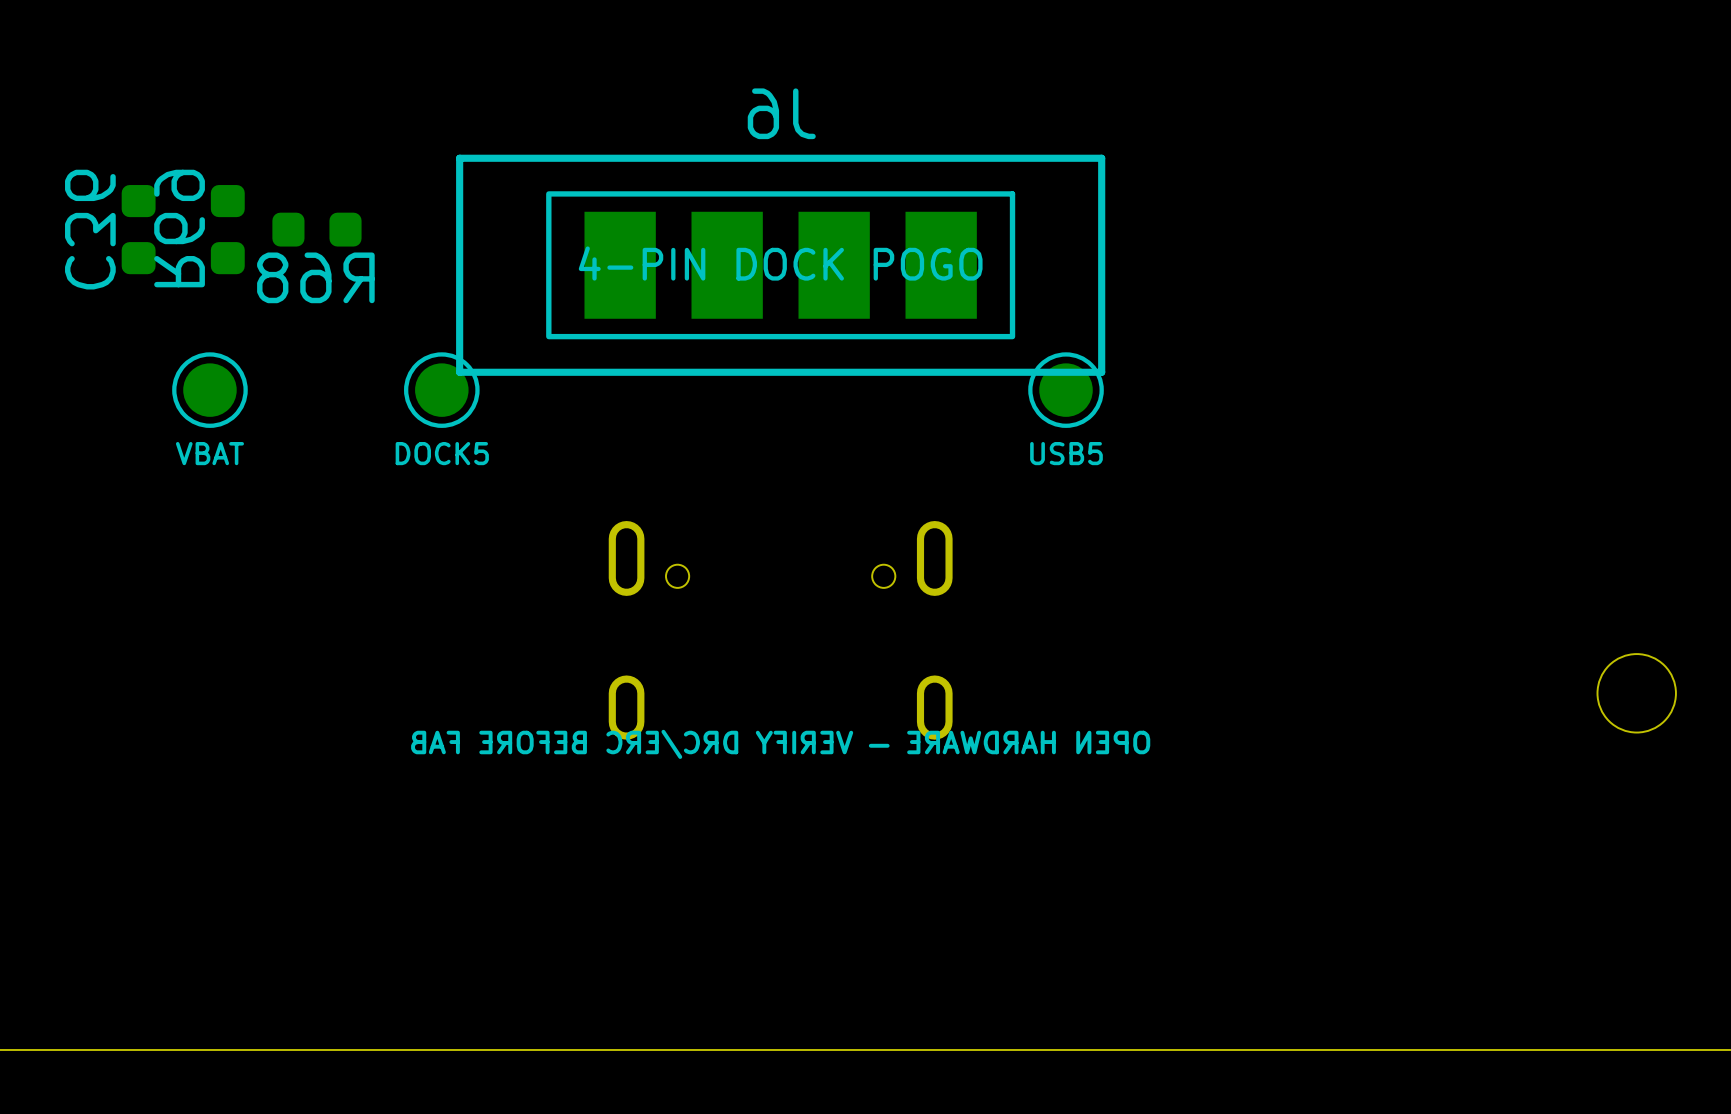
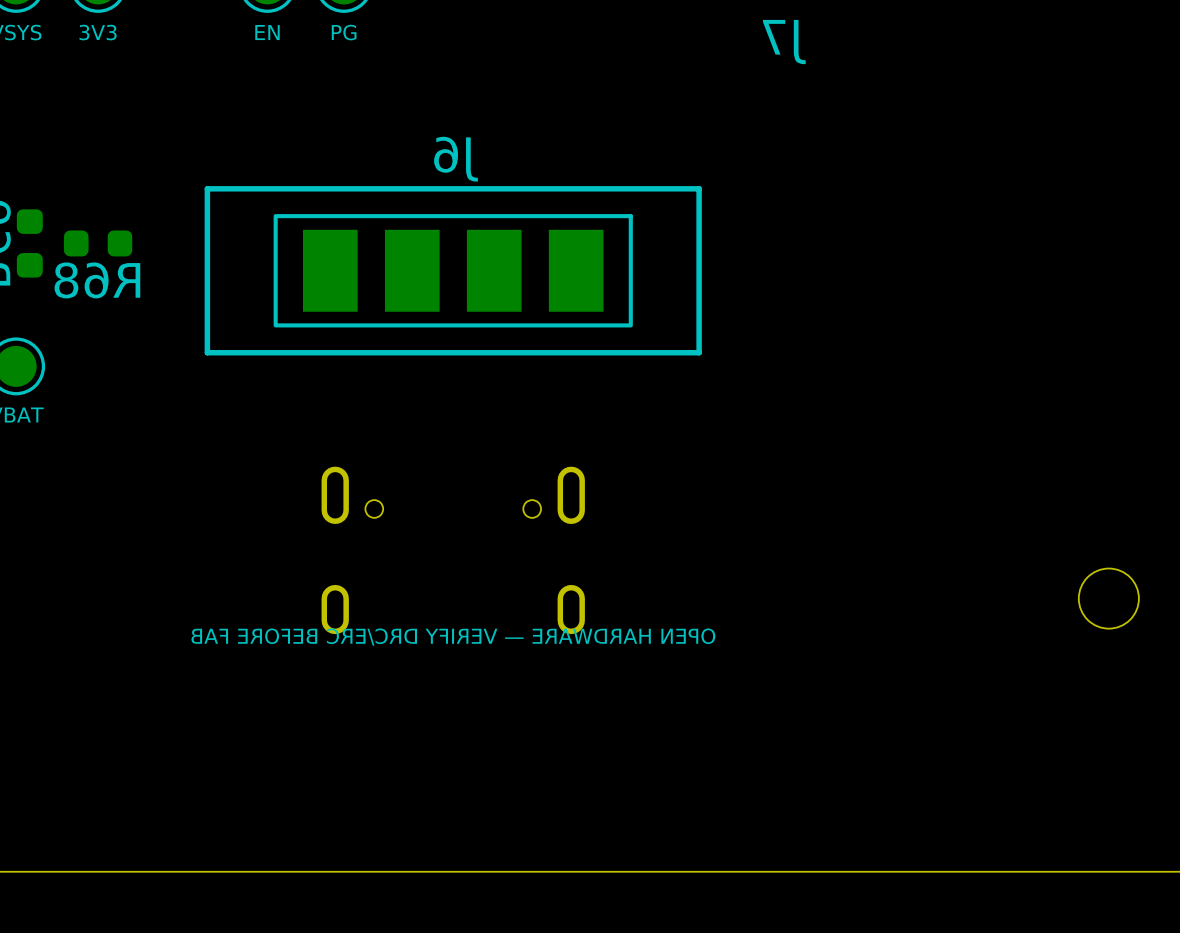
text: 4-PIN DOCK POGO (780, 263) -> none
part: (441, 390) -> none
part: (1066, 390) -> none

